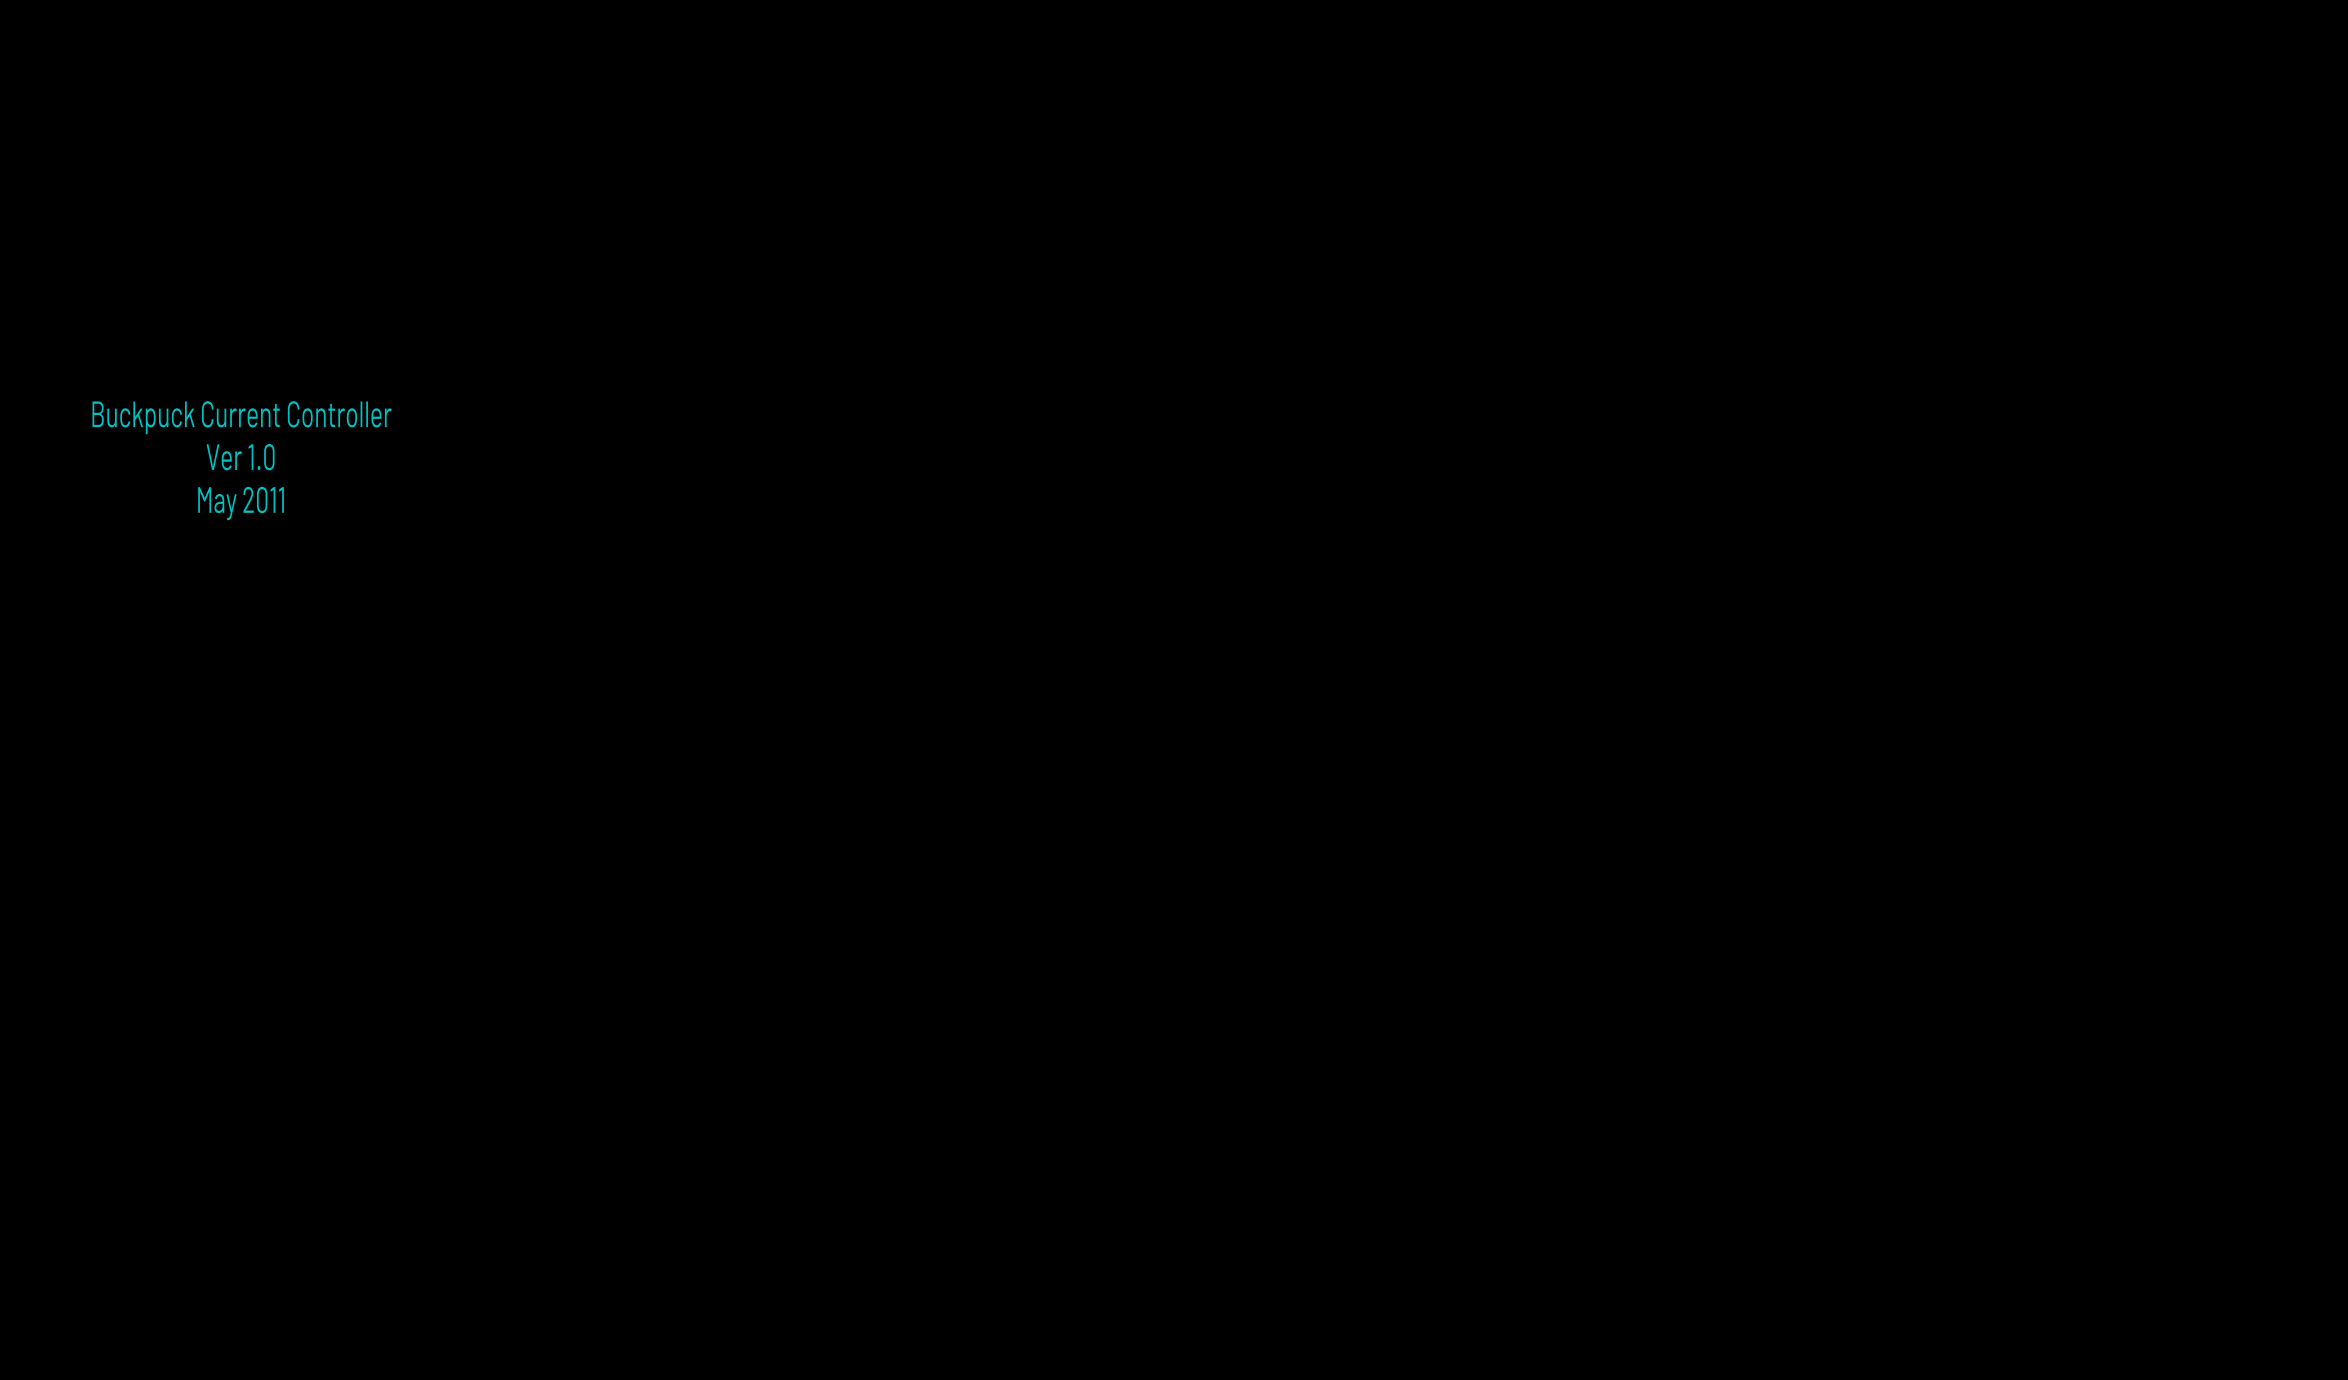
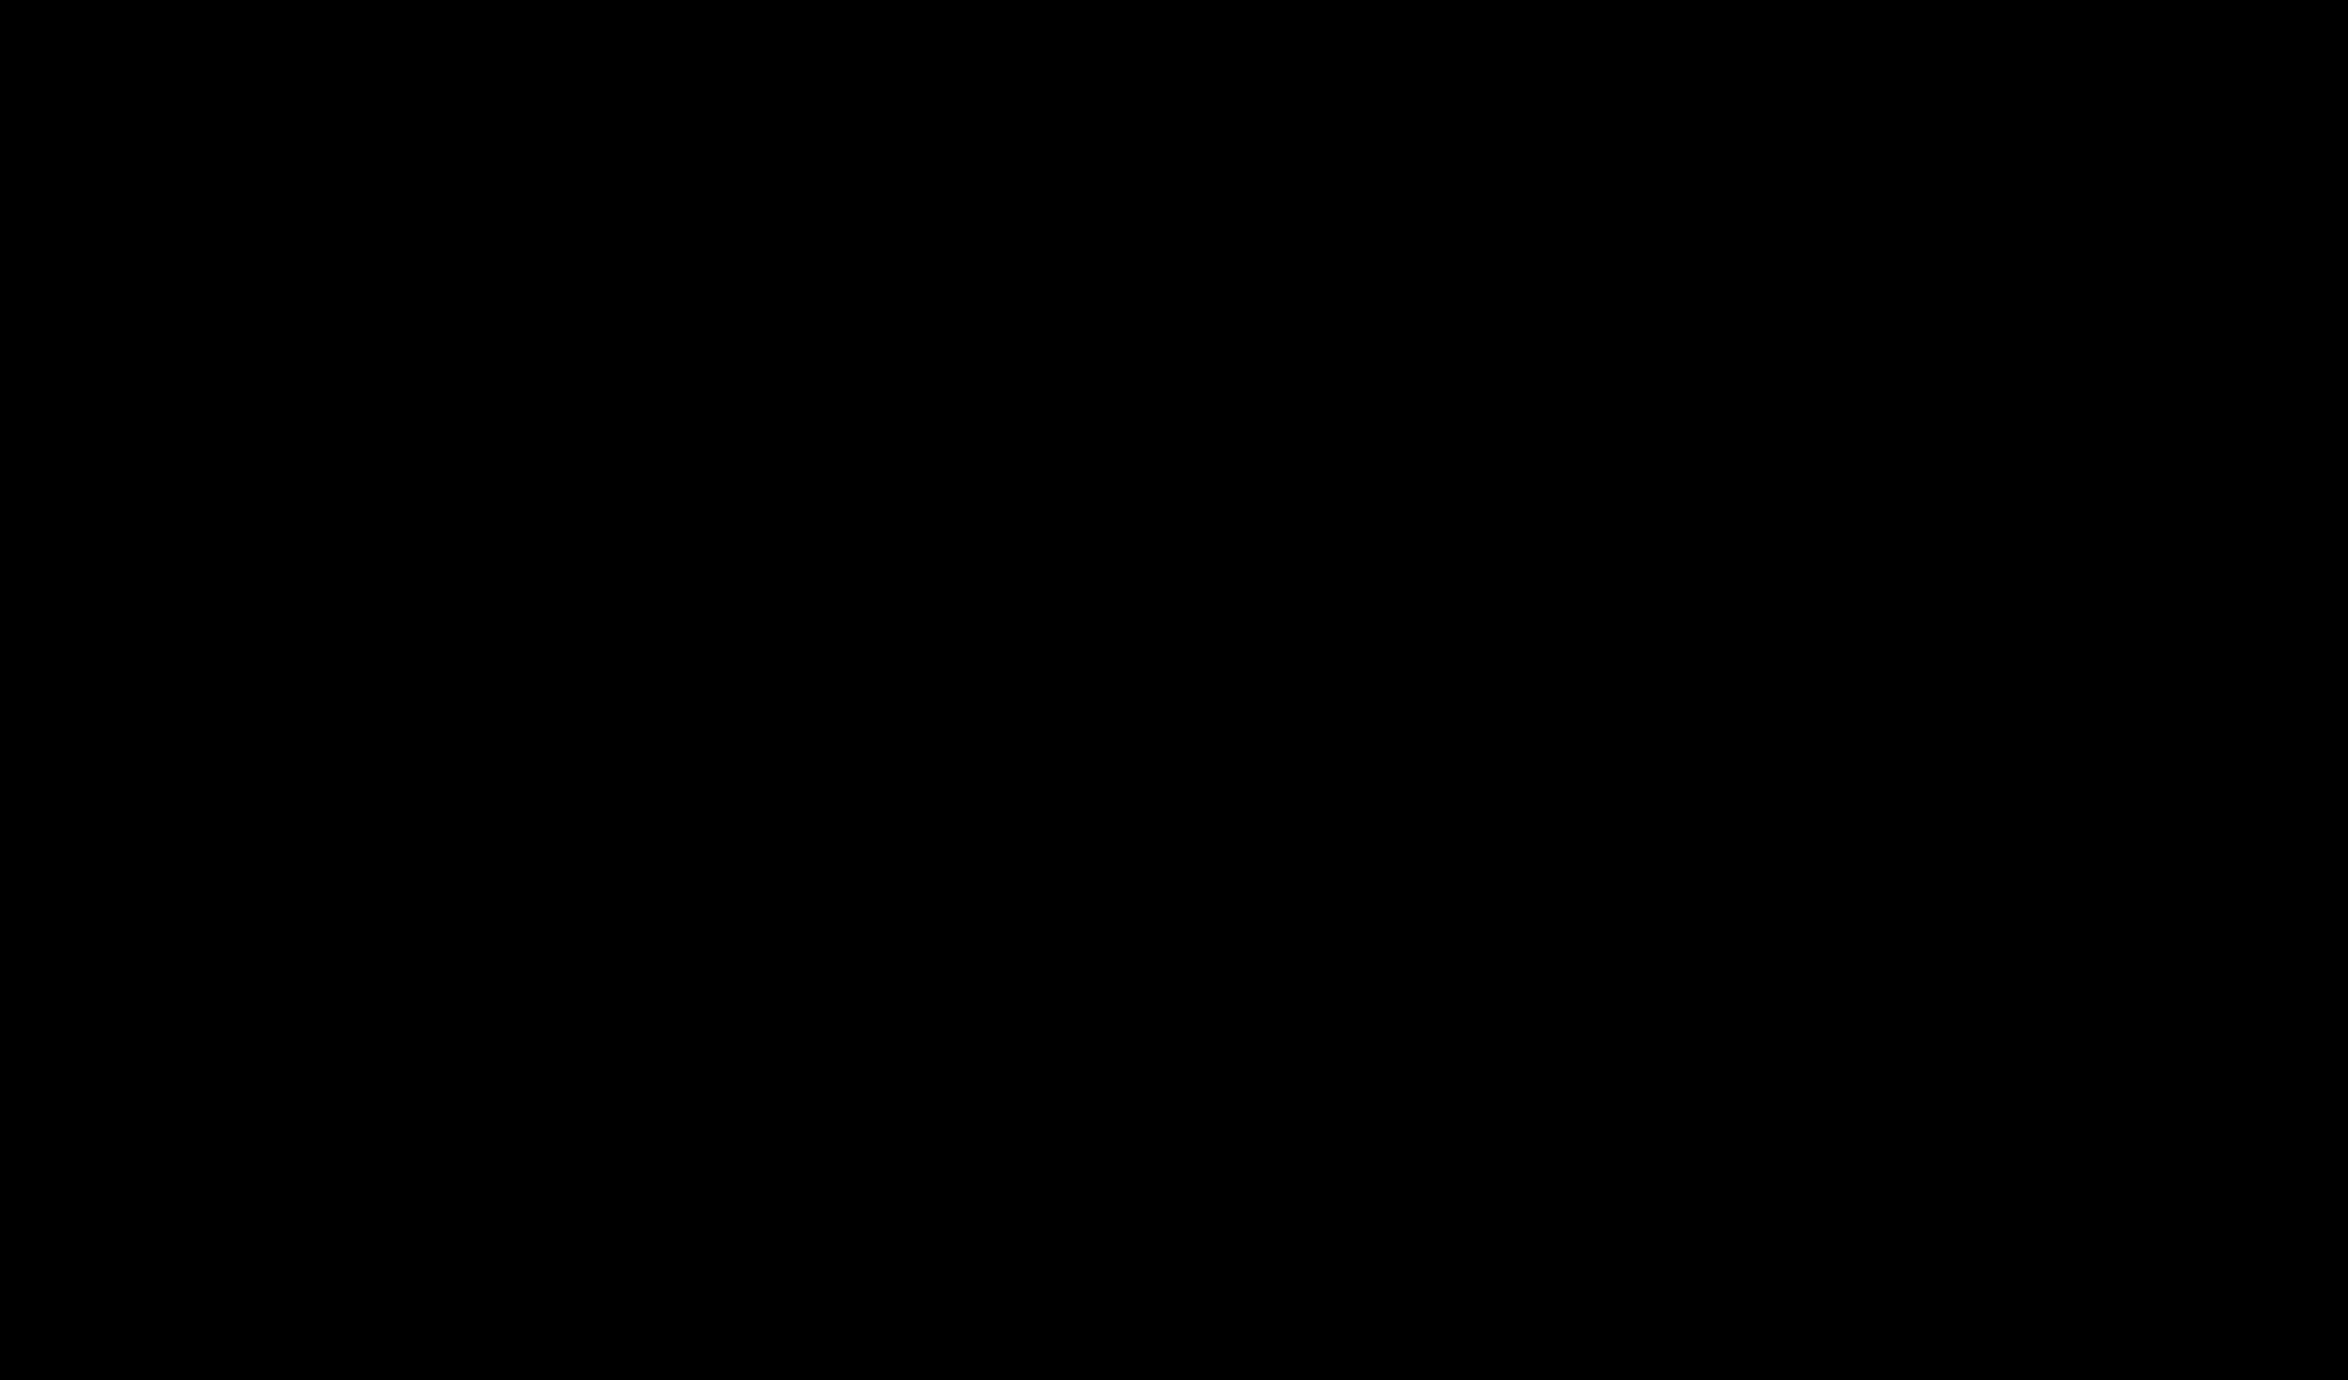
text: Buckpuck Current Controller (242, 417) -> none
text: Ver 1.0 (240, 457) -> none
text: May 2011 (241, 503) -> none

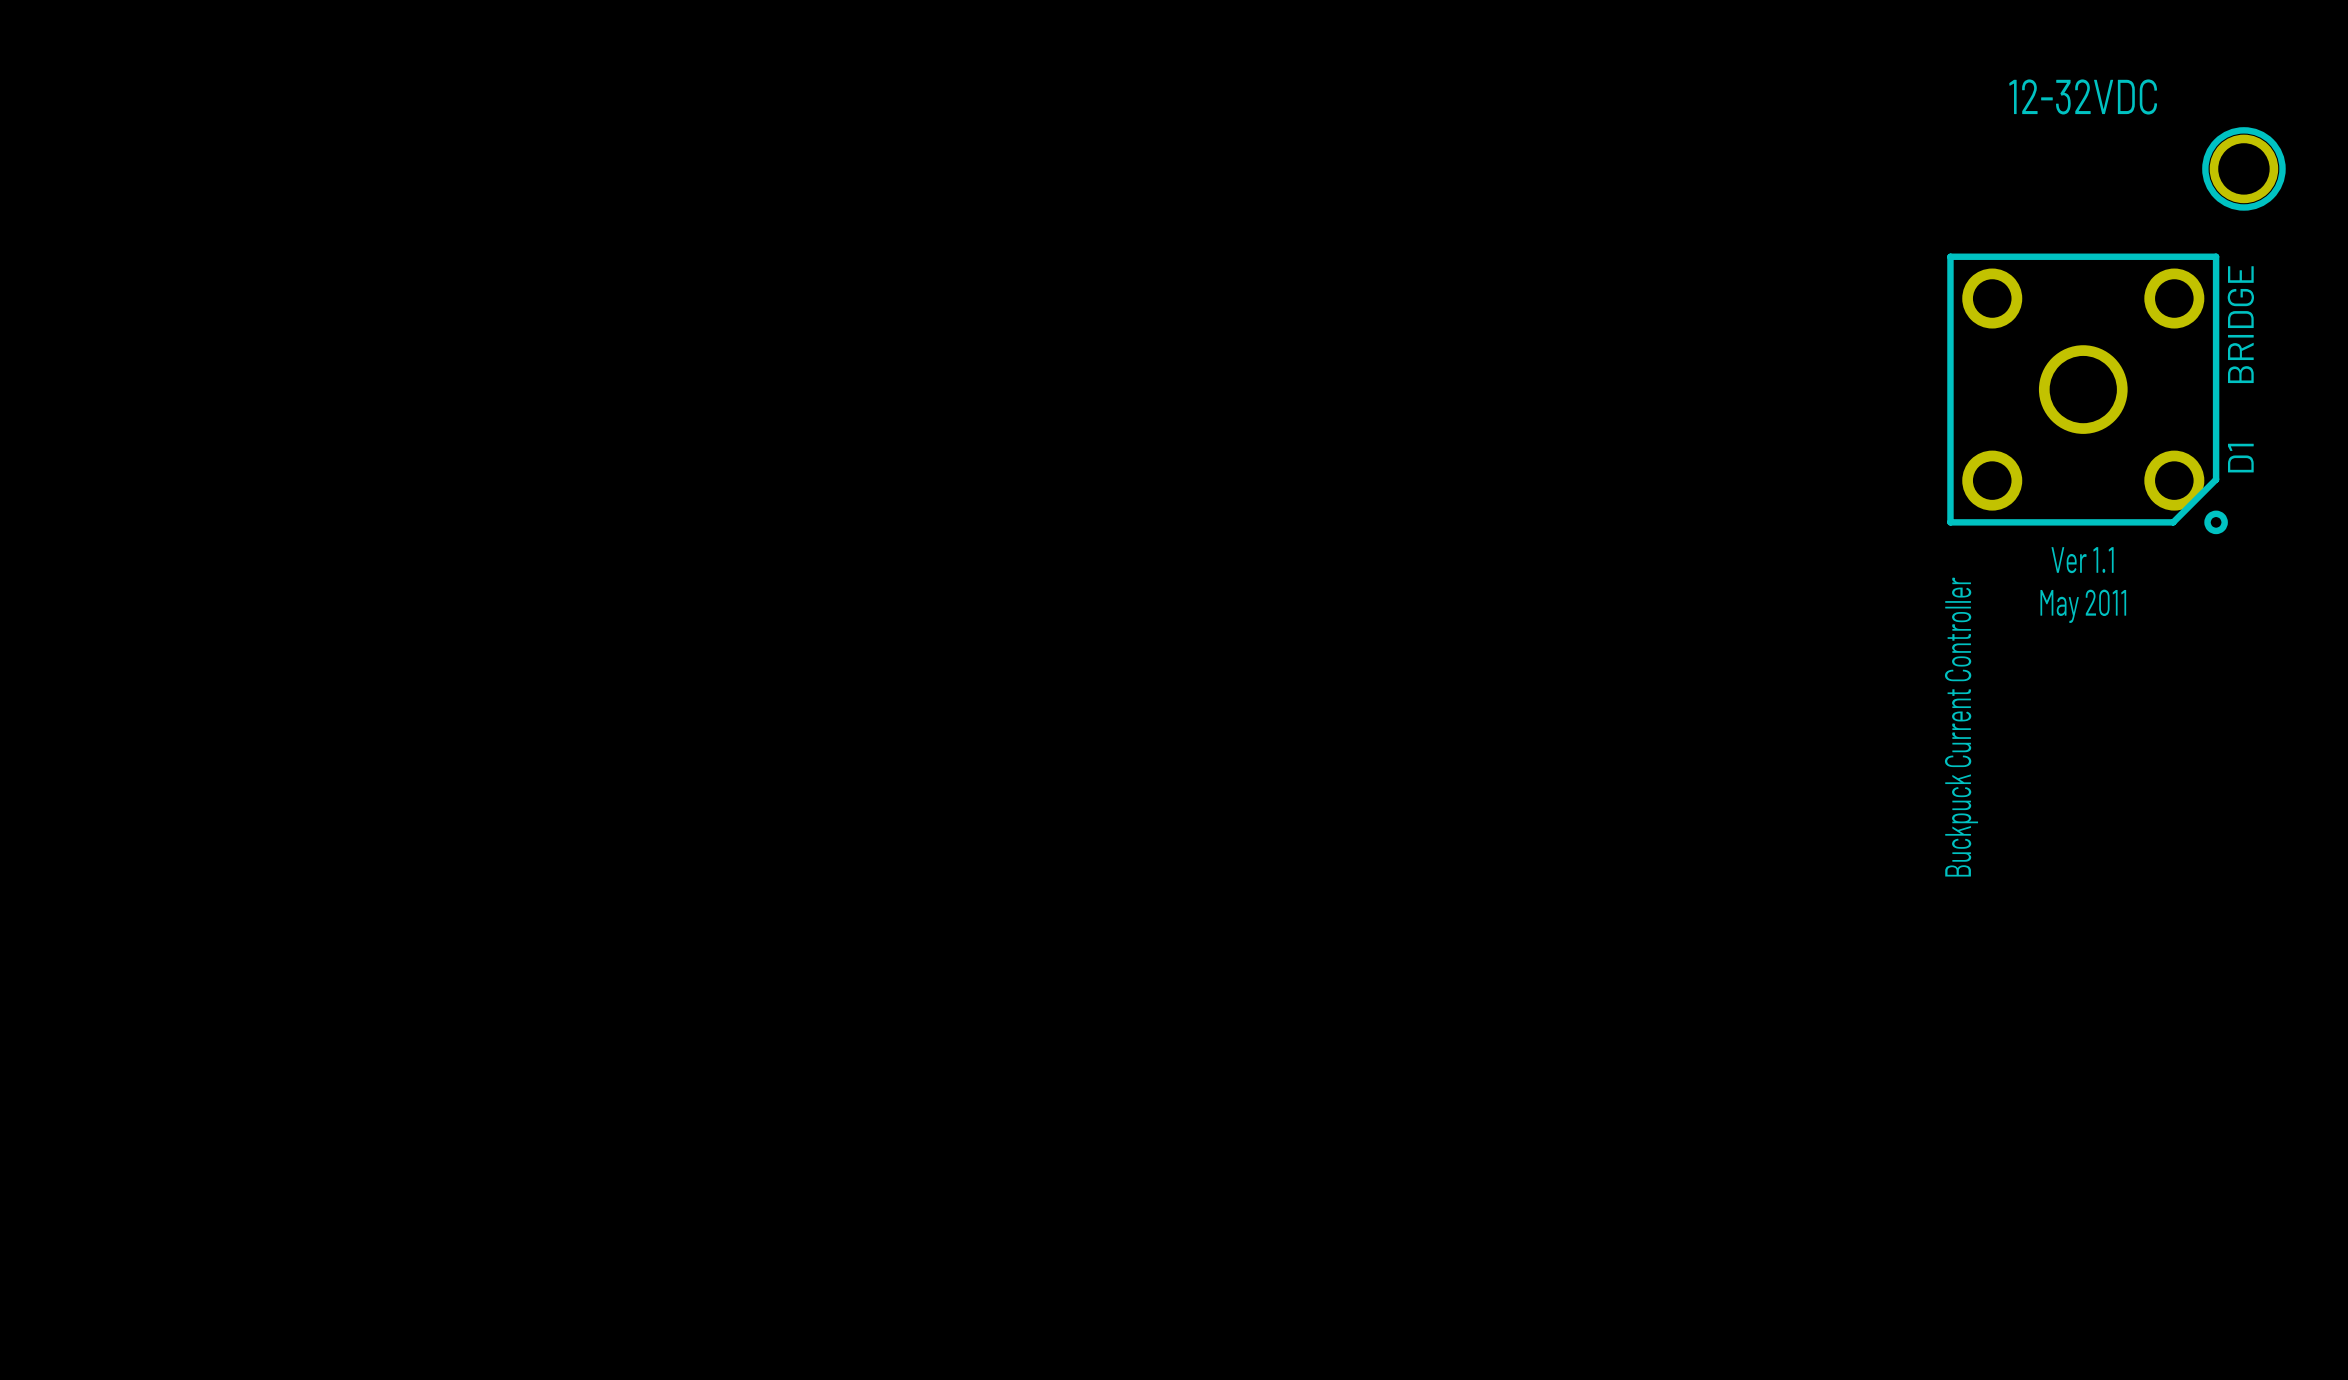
text: none -> 12-32VDC (2083, 96)
part: none -> (2243, 168)
D1: none -> BRIDGE (2087, 393)
text: none -> Ver 1.1 (2082, 560)
text: none -> May 2011 (2083, 606)
text: none -> Buckpuck Current Controller (1961, 727)

